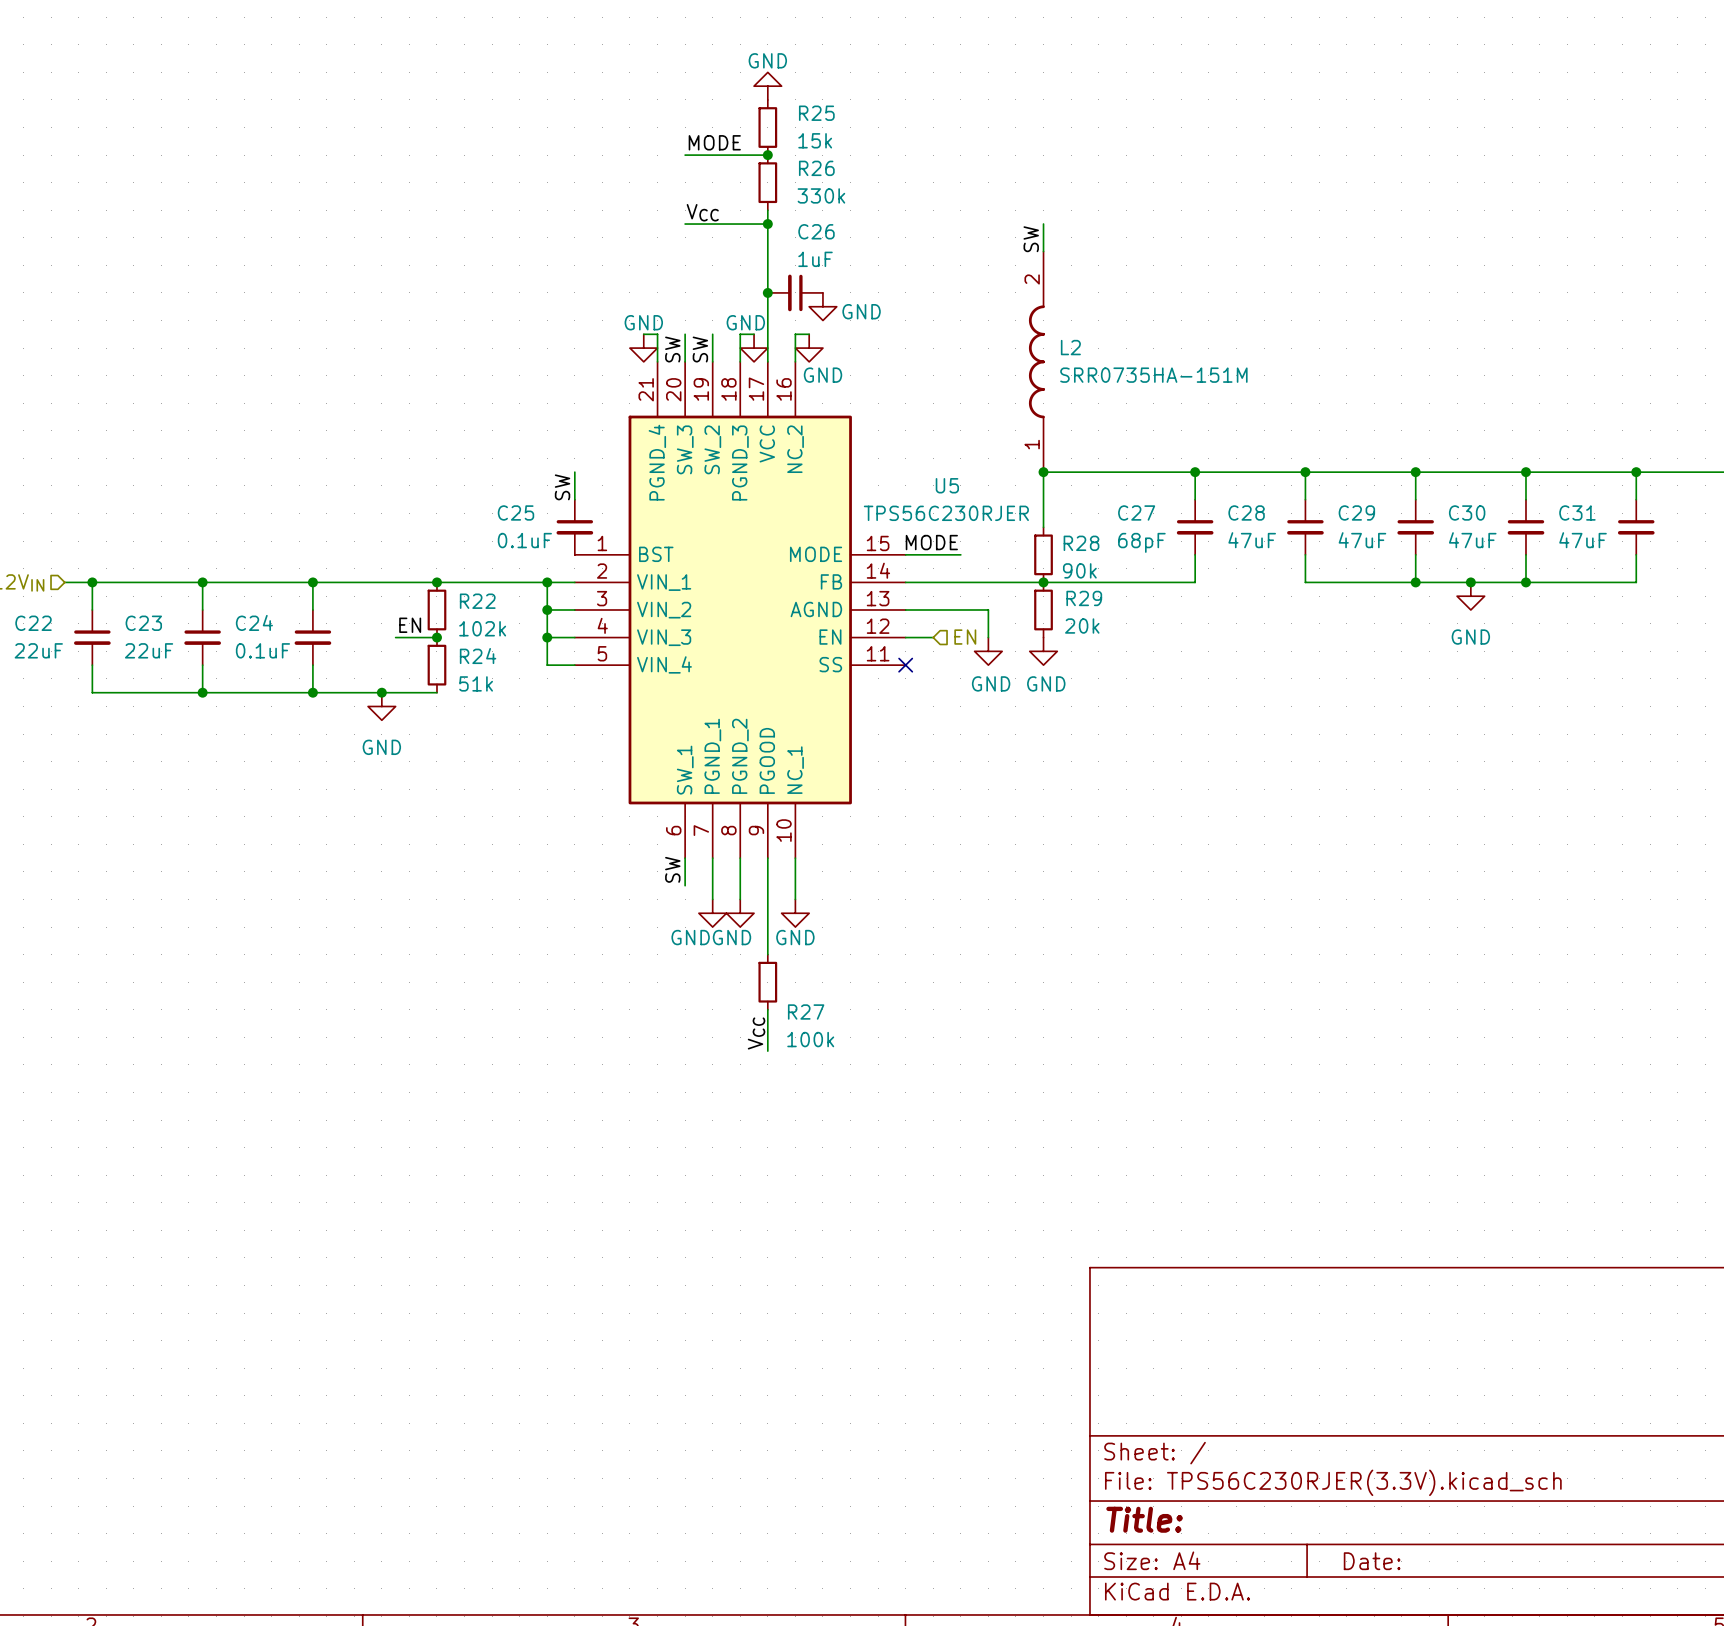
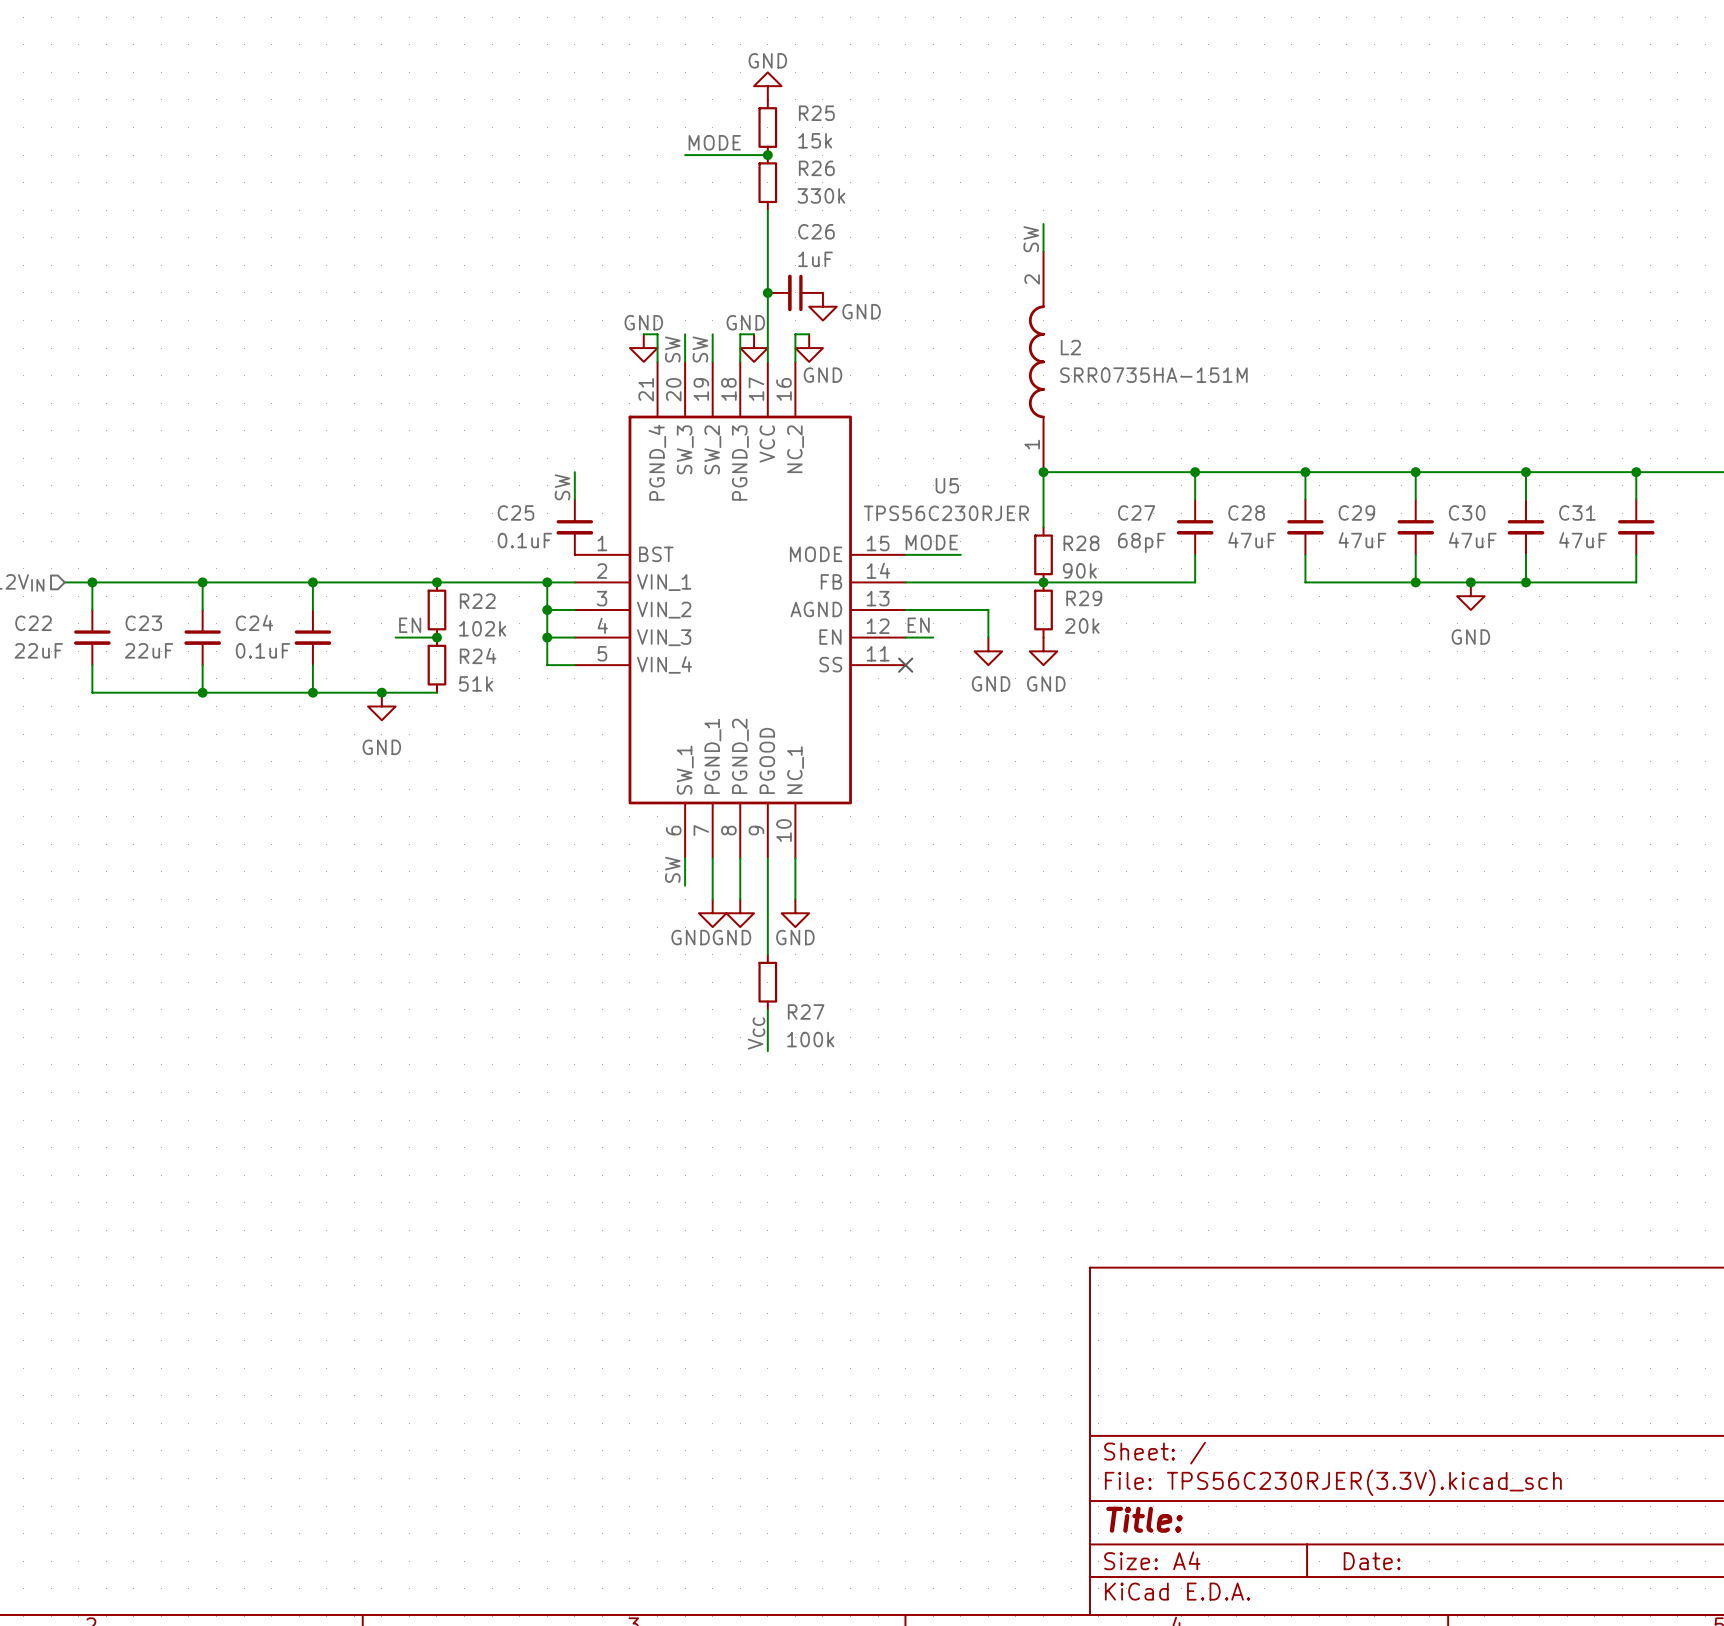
label: VCC (702, 212) -> none
wire: (685, 224) (767, 224) -> none
junction: (767, 224) -> none
label: none -> EN (918, 625)
hierarchical label: EN (965, 637) -> none

